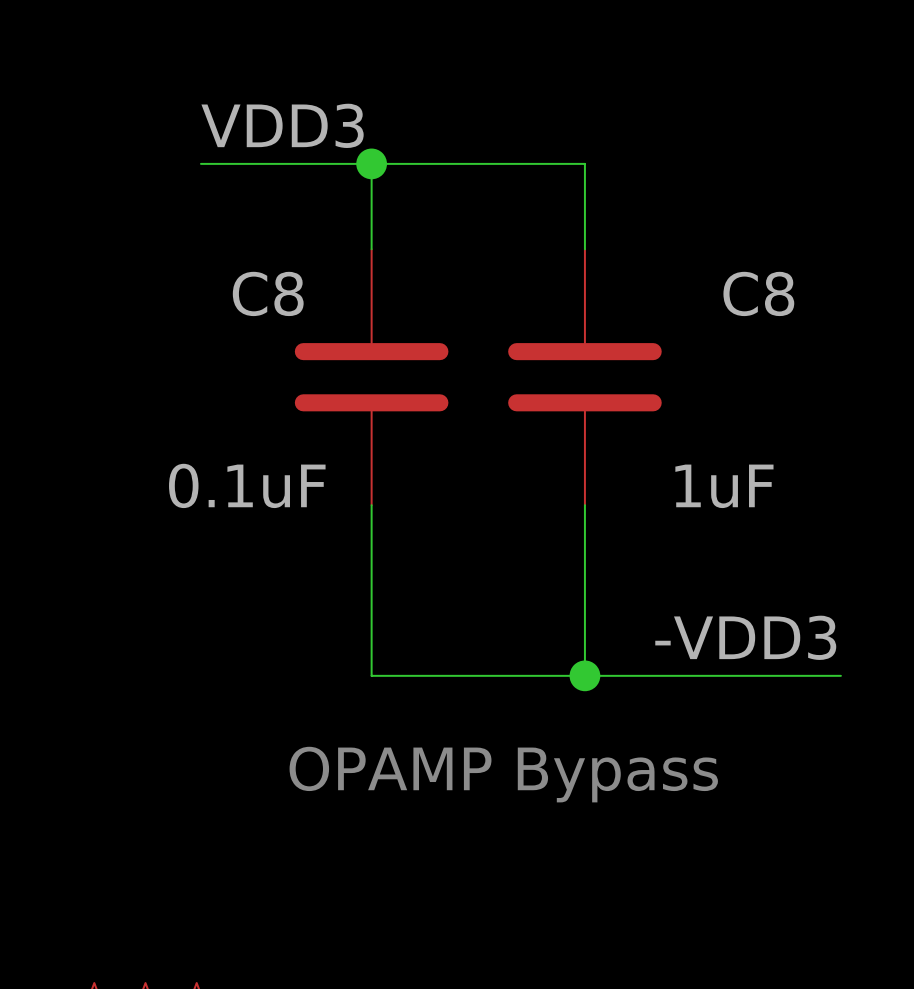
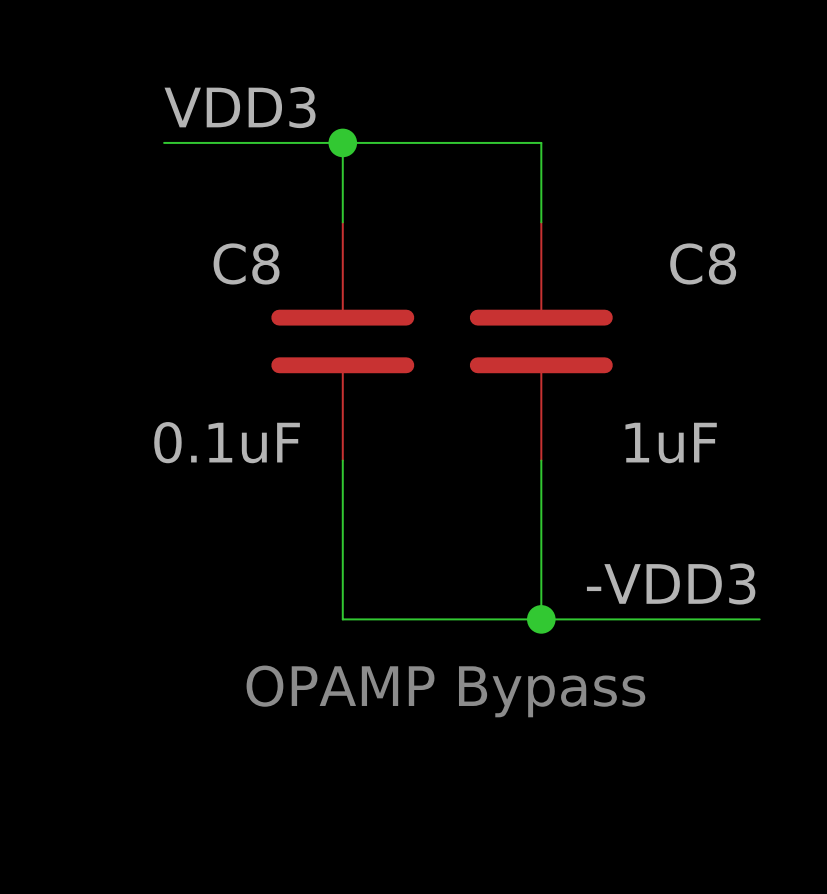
label position: VDD3 (282, 125) -> VDD3 (240, 107)
label position: -VDD3 (745, 637) -> -VDD3 (671, 583)
wire: (819, 675) (840, 675) -> (164, 142) (183, 142)
text position: OPAMP Bypass (503, 774) -> OPAMP Bypass (445, 691)

